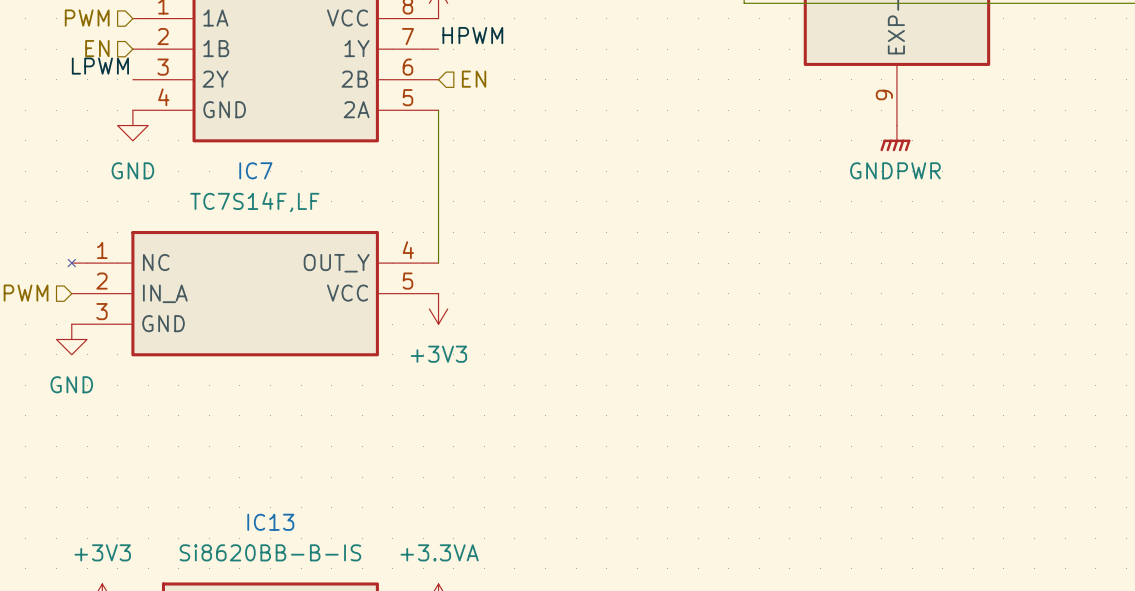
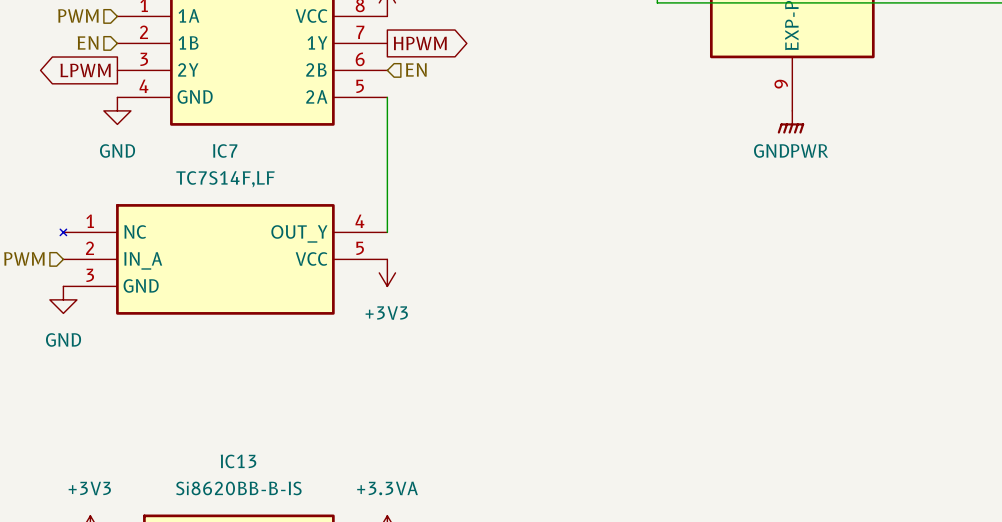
label: HPWM (472, 35) -> none
global label: none -> HPWM (420, 43)
label: LPWM (100, 66) -> none
global label: none -> LPWM (85, 70)

